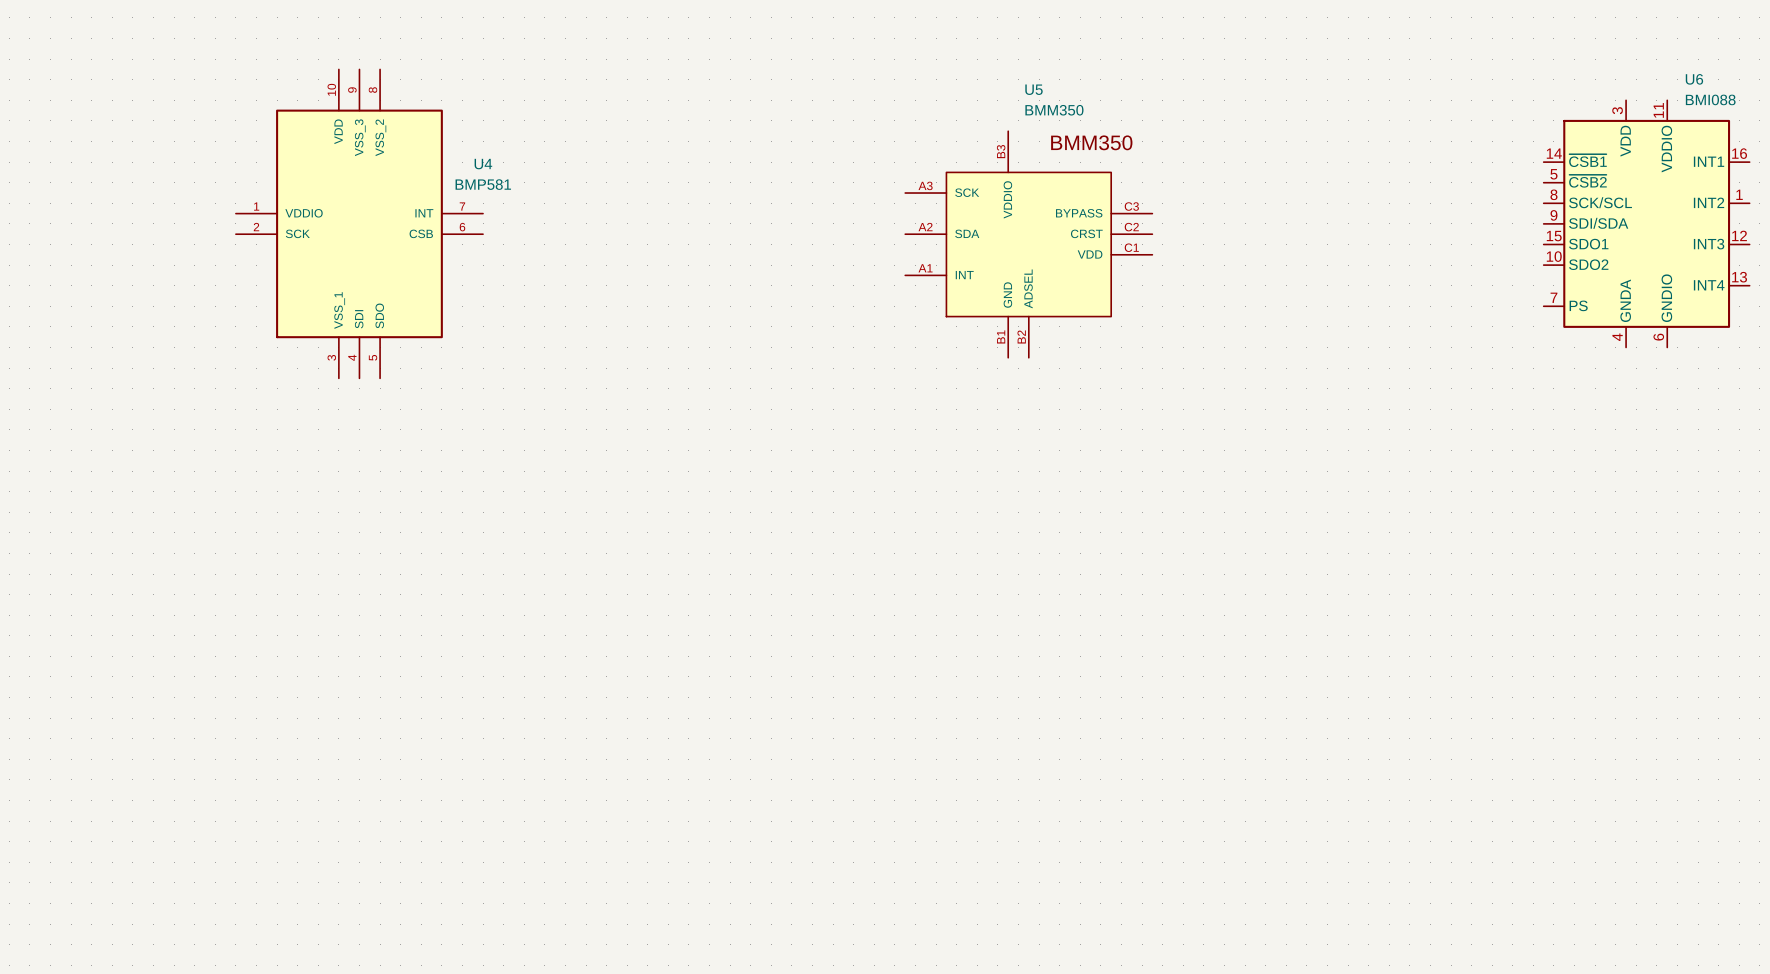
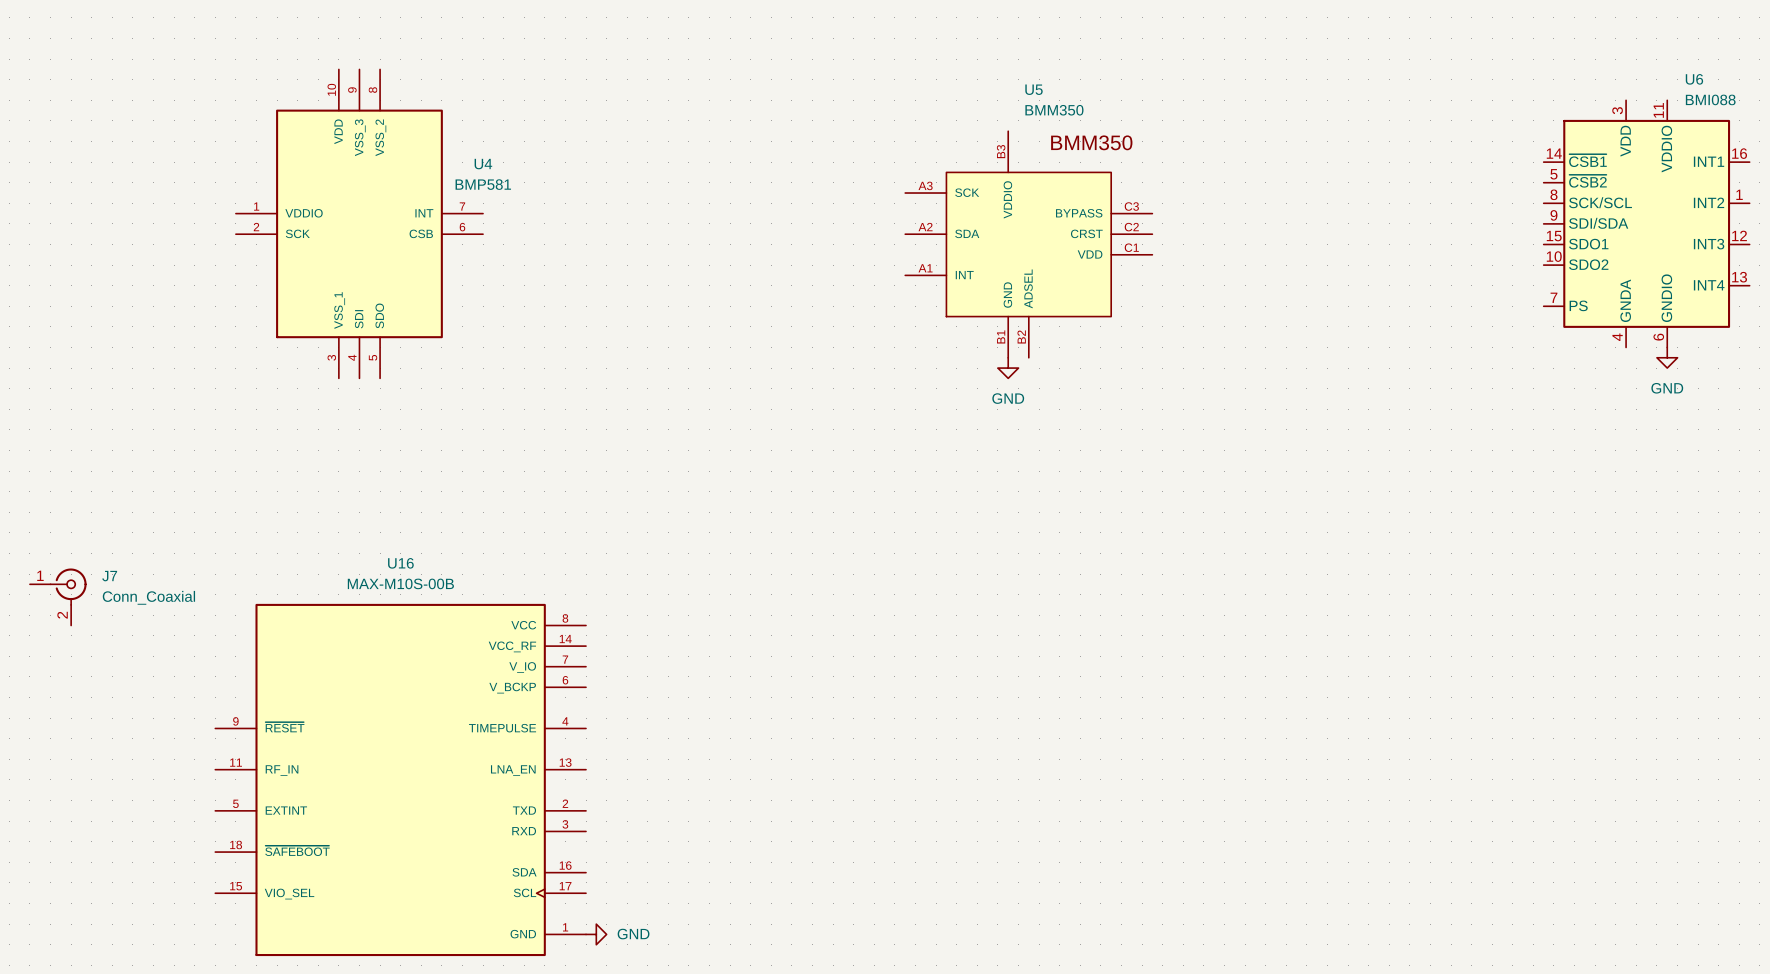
power symbol: none -> GND (1667, 357)
power symbol: none -> GND (1008, 368)
J7: none -> Conn_Coaxial (58, 596)
U16: none -> MAX-M10S-00B (400, 779)
power symbol: none -> GND (596, 934)

